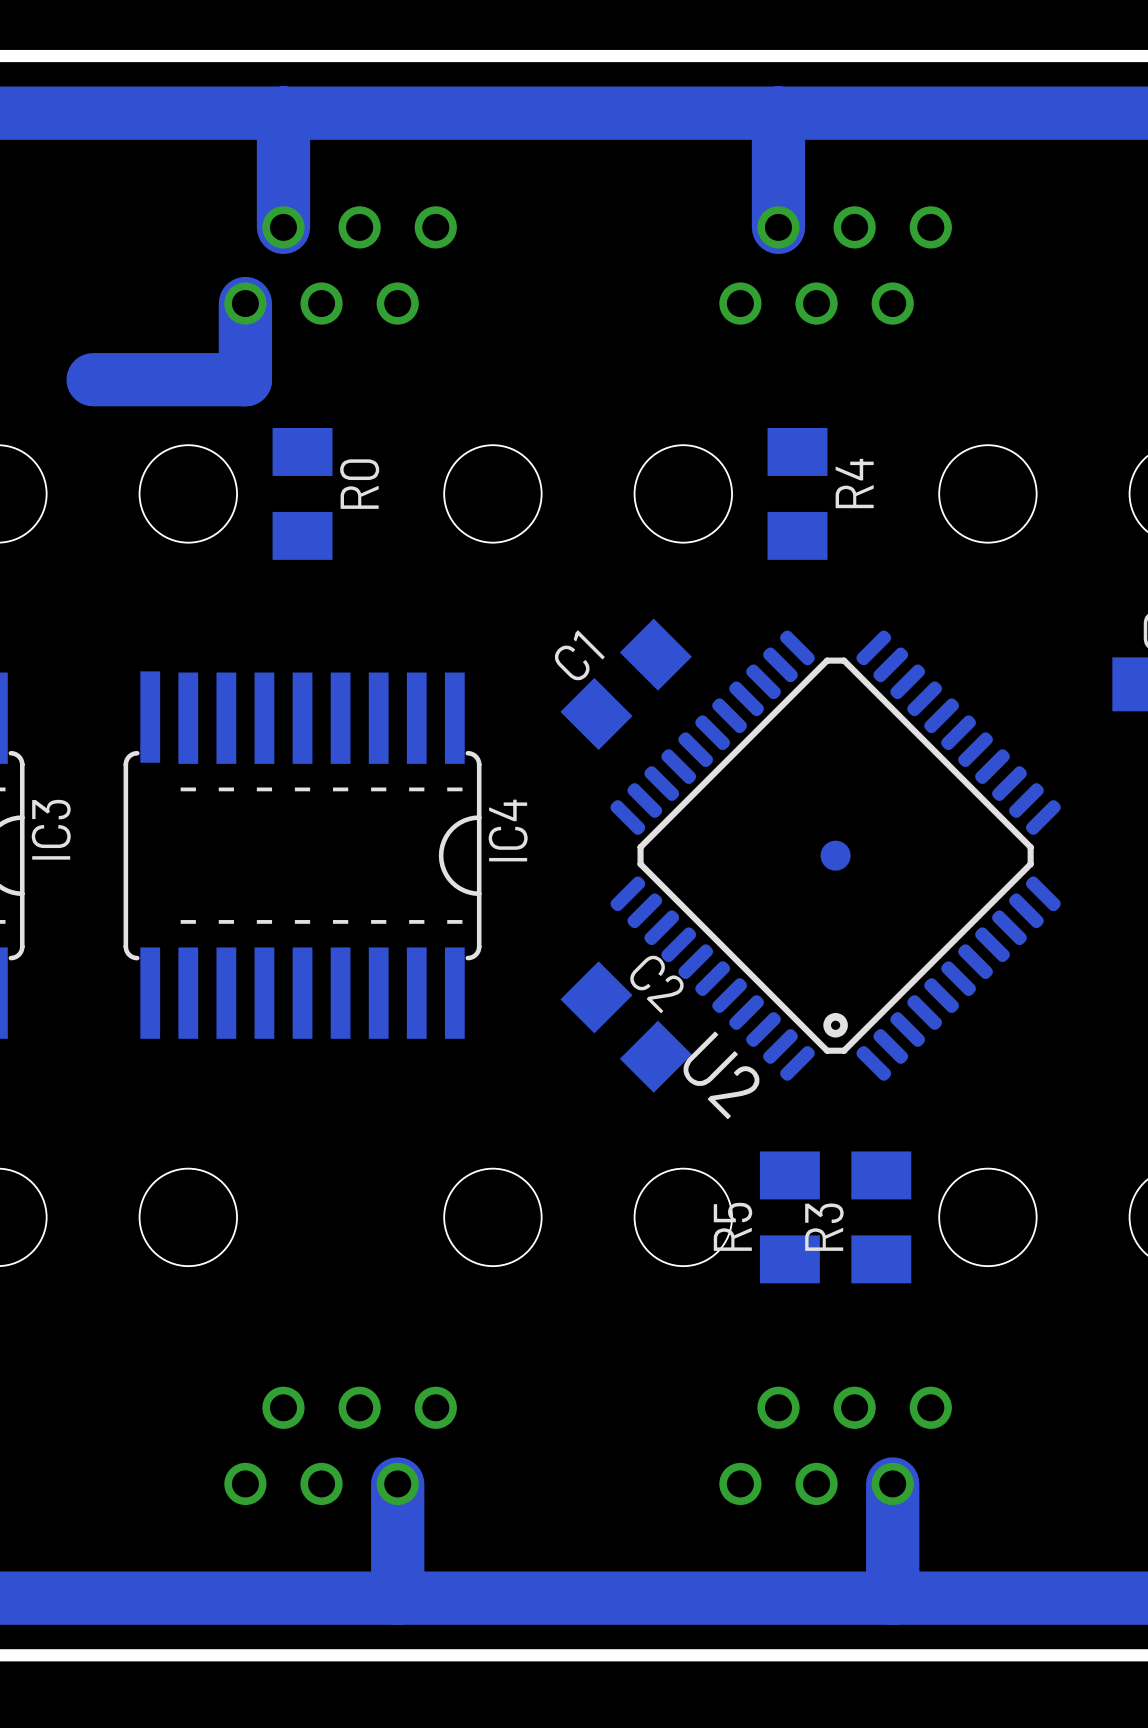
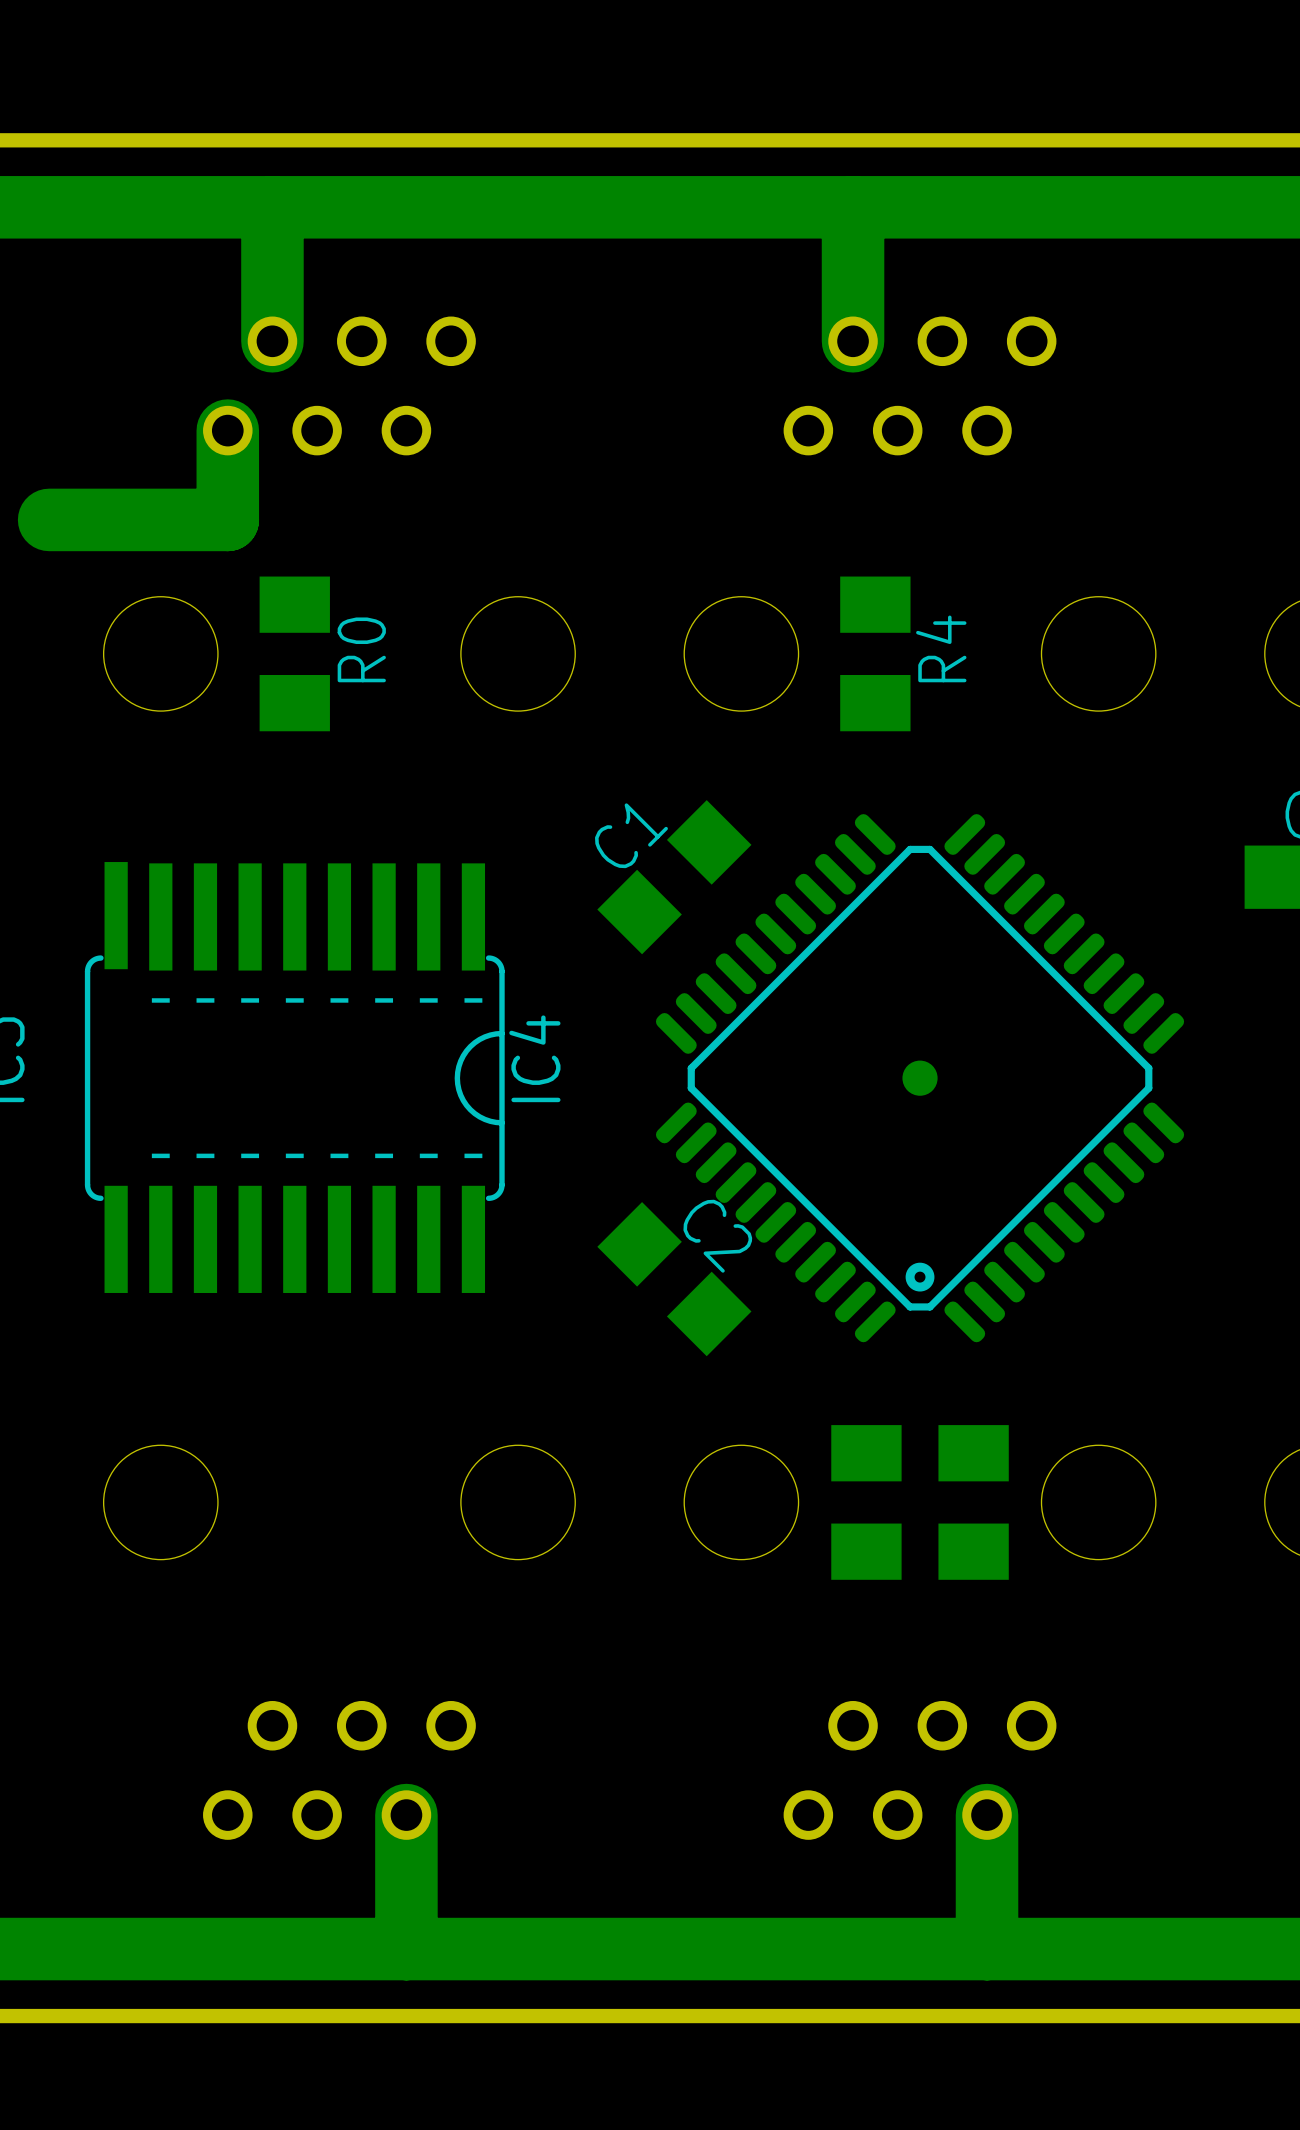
U2 name: U2 (721, 1075) -> none
R5 name: R5 (732, 1226) -> none
R3 name: R3 (824, 1227) -> none

